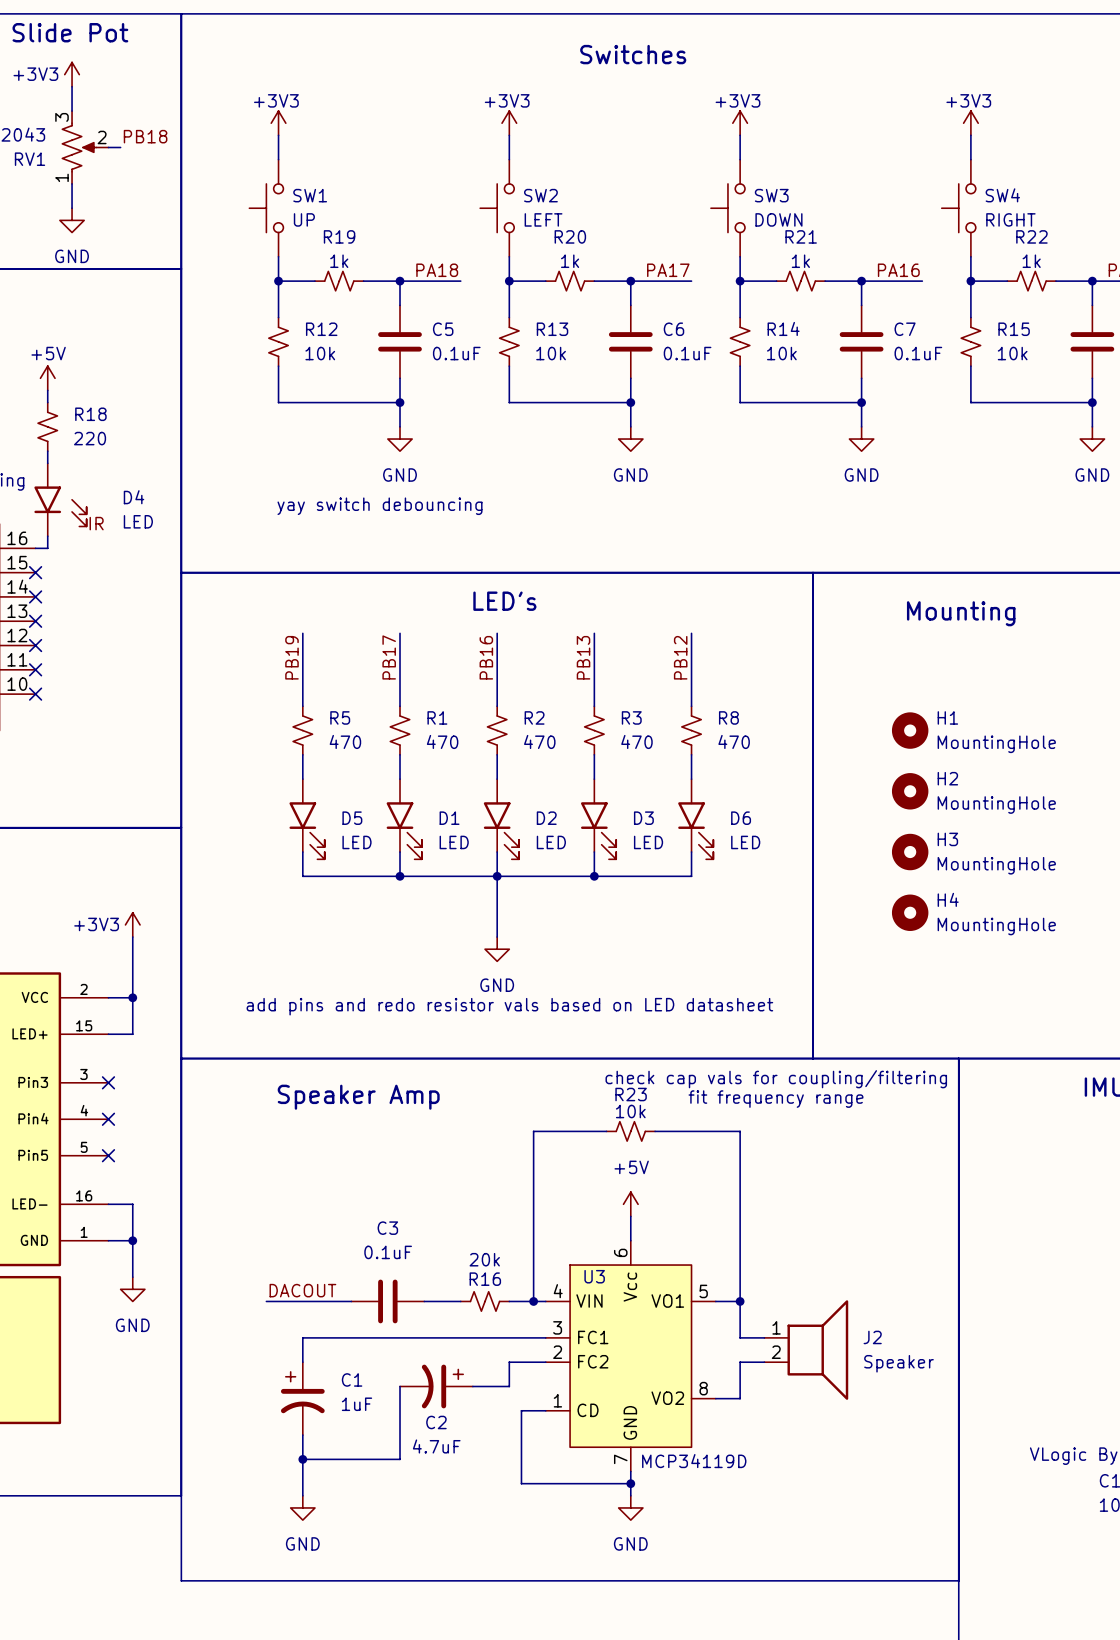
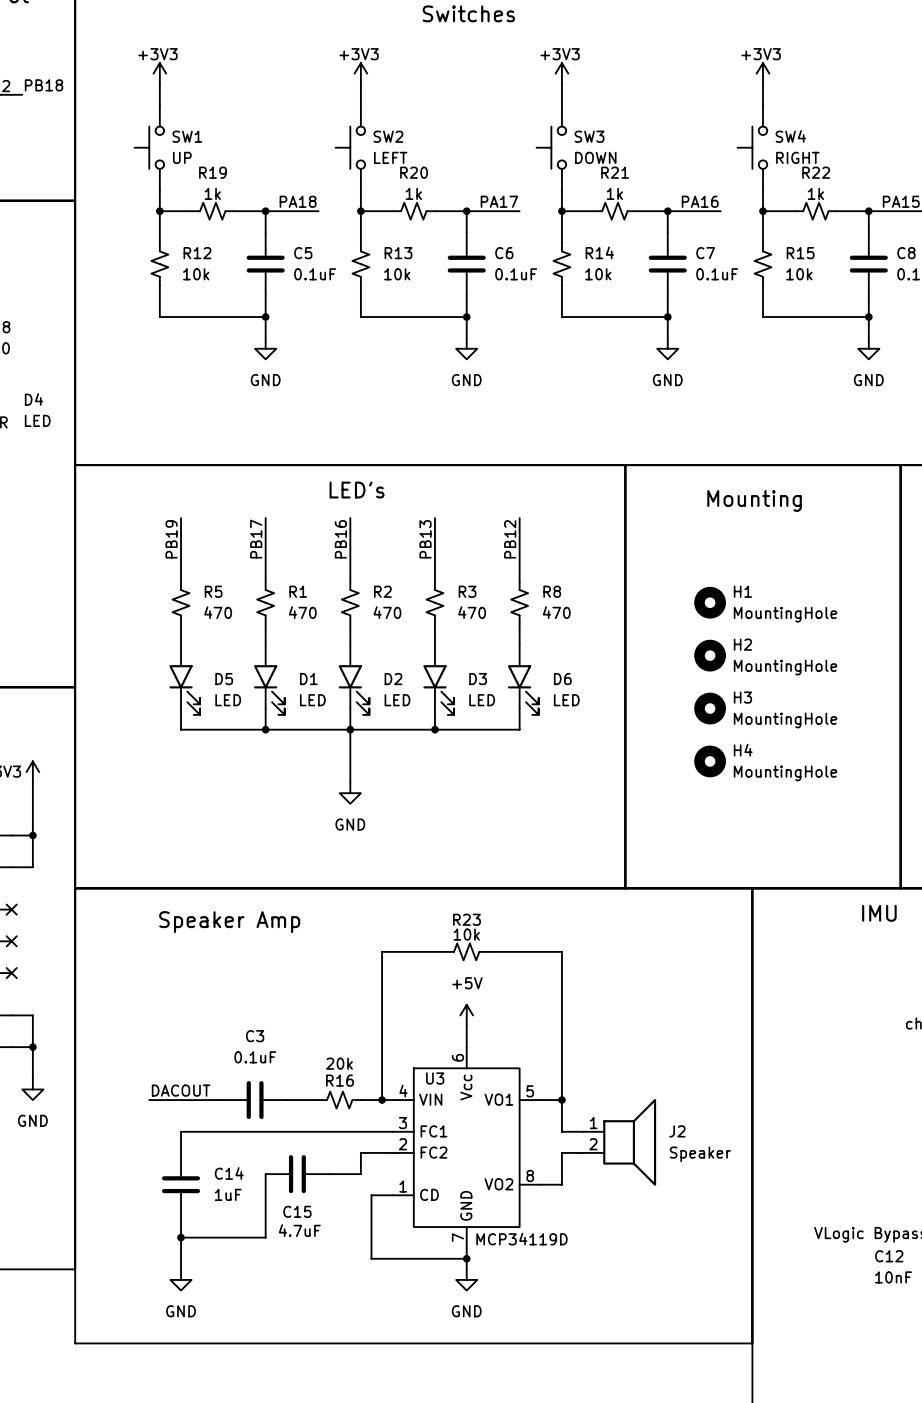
text: yay switch debouncing (379, 506) -> none
text: add pins and redo resistor vals based on LED datasheet (509, 1006) -> none
text: check cap vals for coupling/filtering (776, 1079) -> none
text: fit frequency range (775, 1099) -> none
C2: 4.7uF (436, 1386) -> none
C15: none -> 4.7uF (297, 1174)
C1: 1uF (302, 1398) -> none
C14: none -> 1uF (181, 1184)

